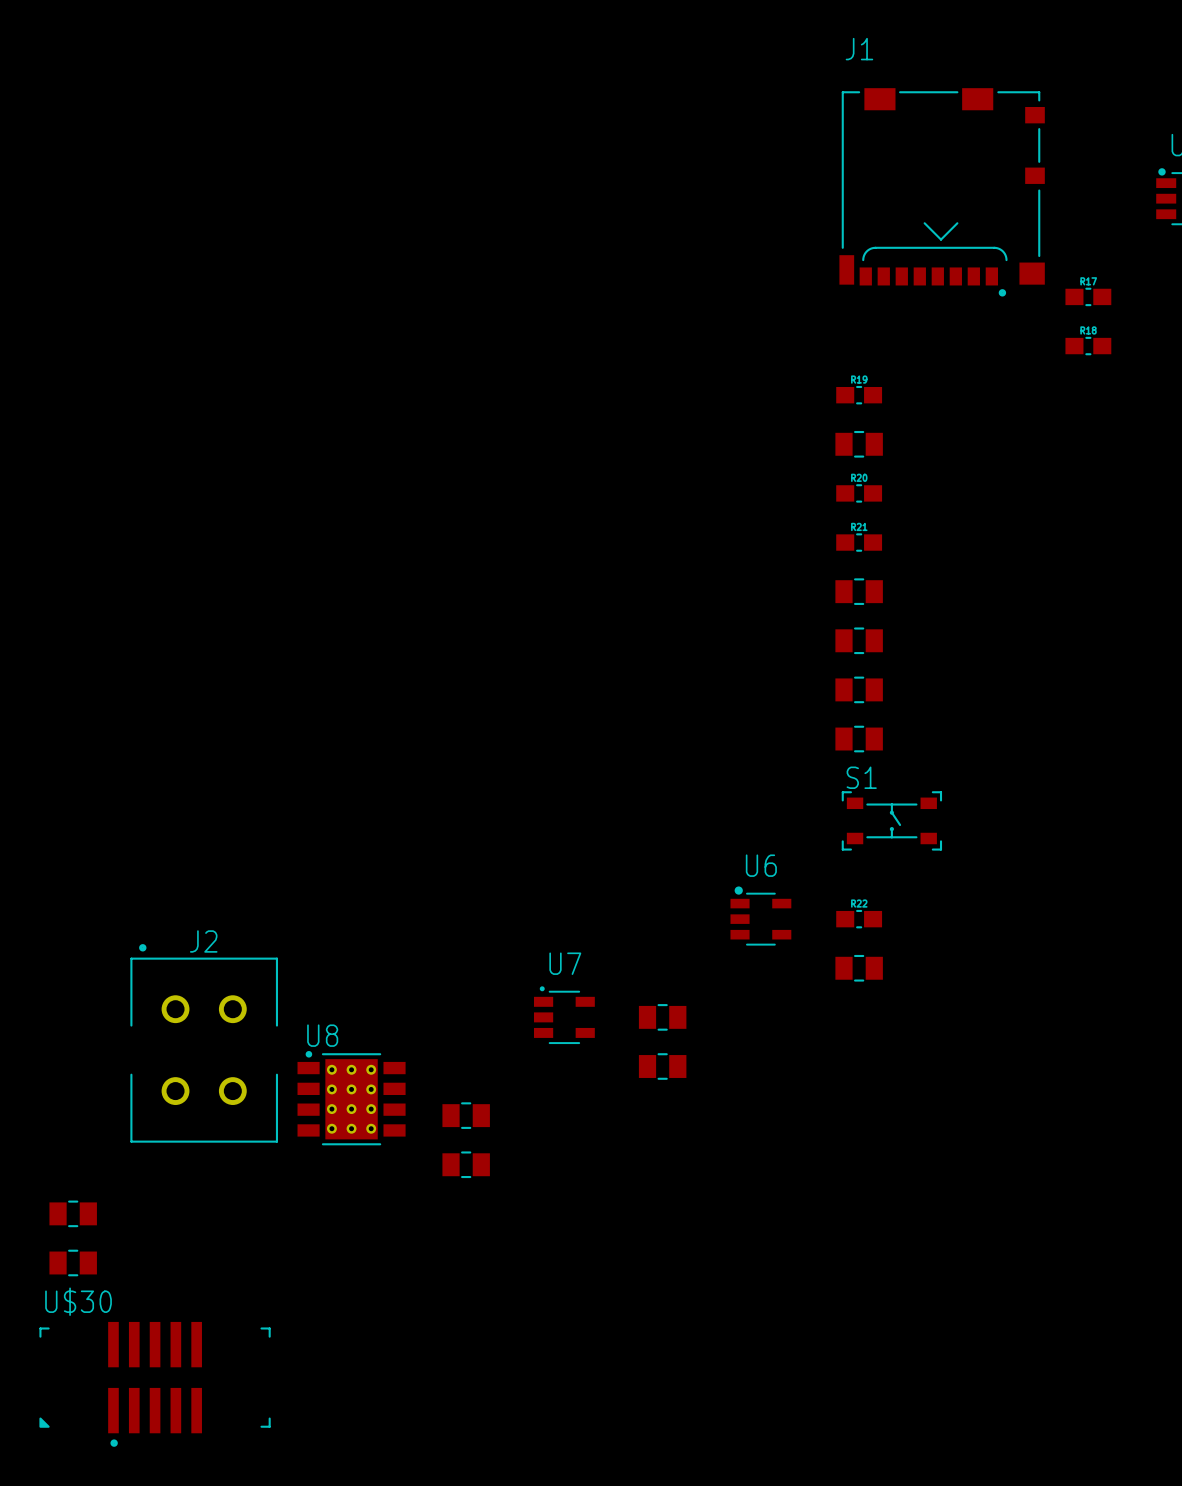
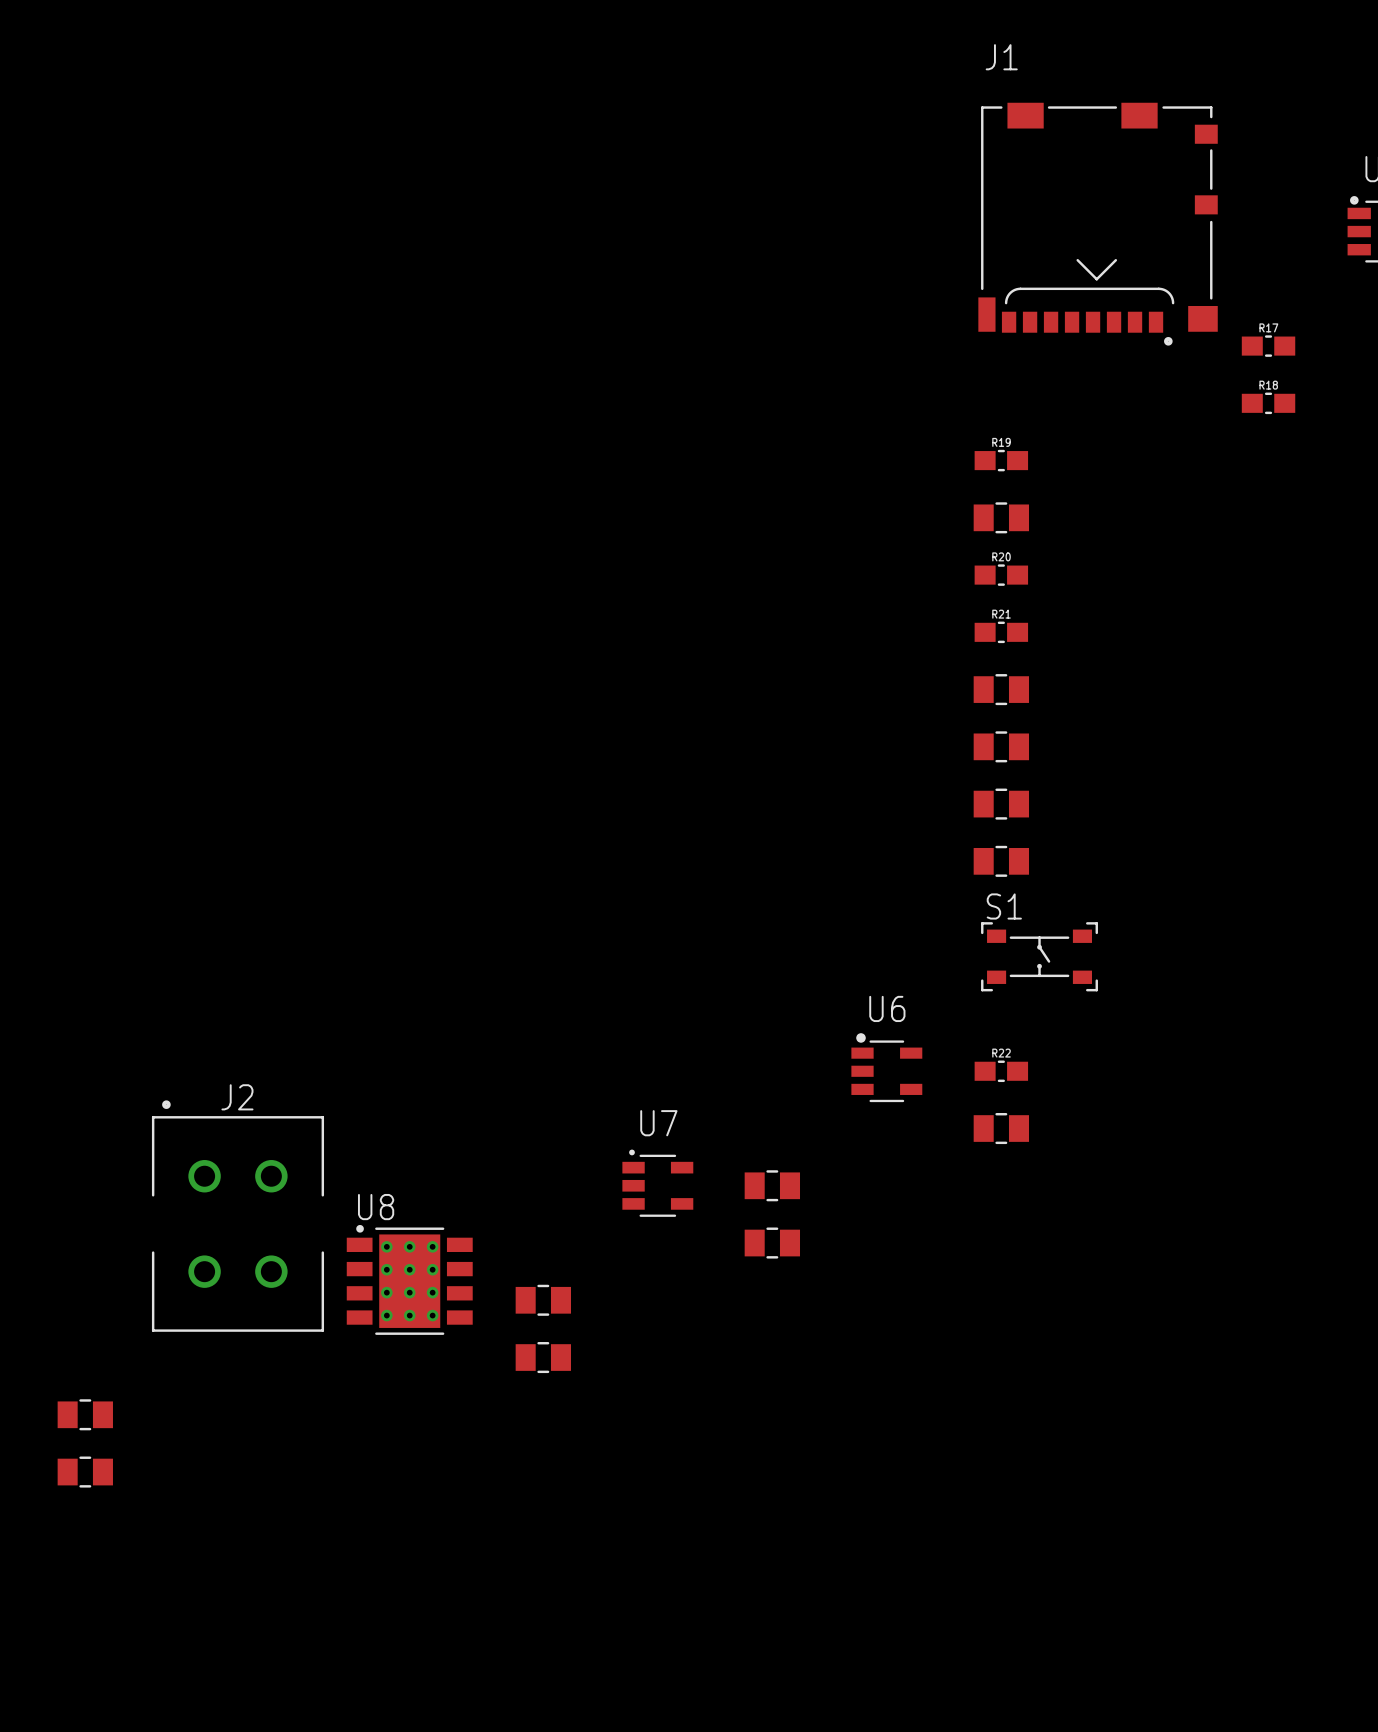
U$30: (155, 1384) -> none

